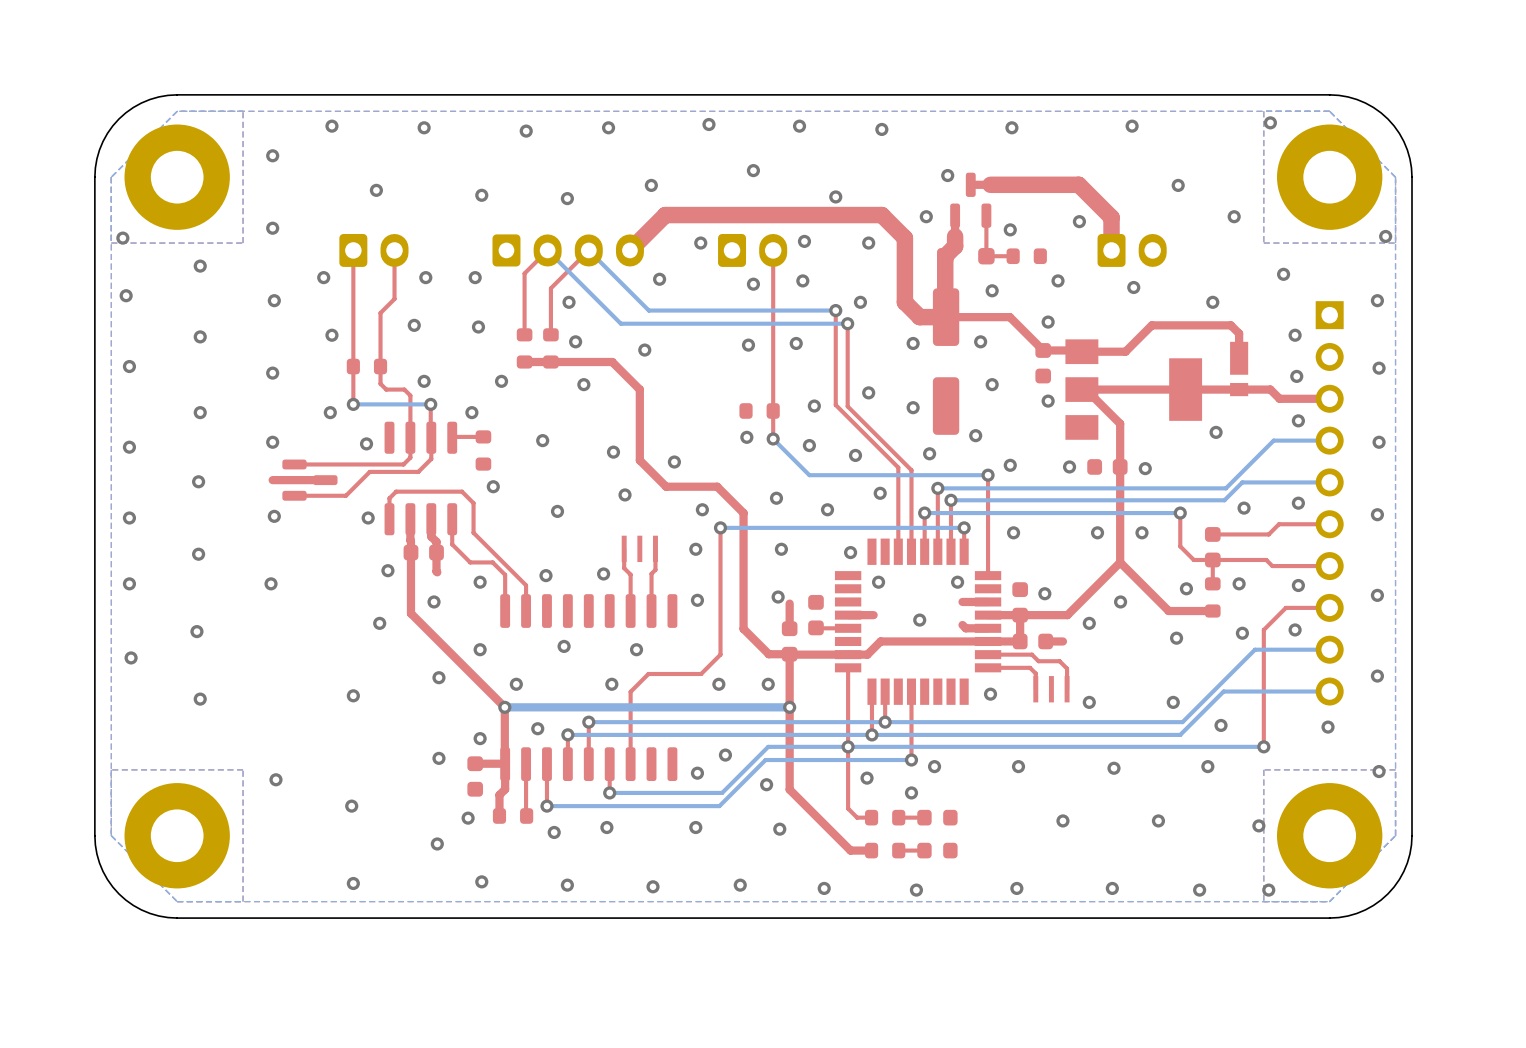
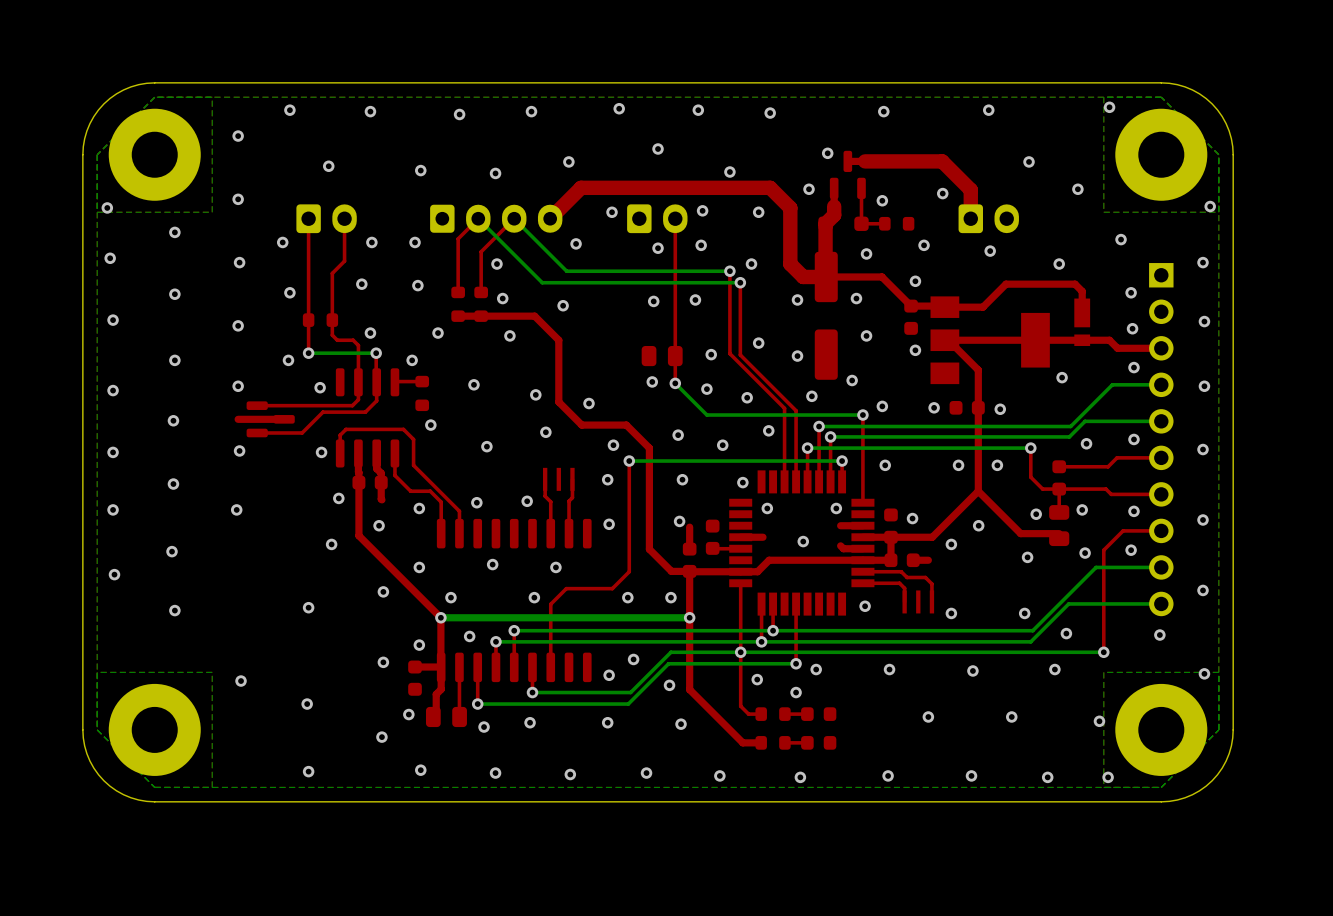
part footprint: [739, 403, 780, 419] -> [641, 345, 683, 367]
part footprint: [1204, 577, 1221, 618] -> [1049, 505, 1070, 547]
part footprint: [492, 808, 534, 824] -> [425, 706, 467, 728]

